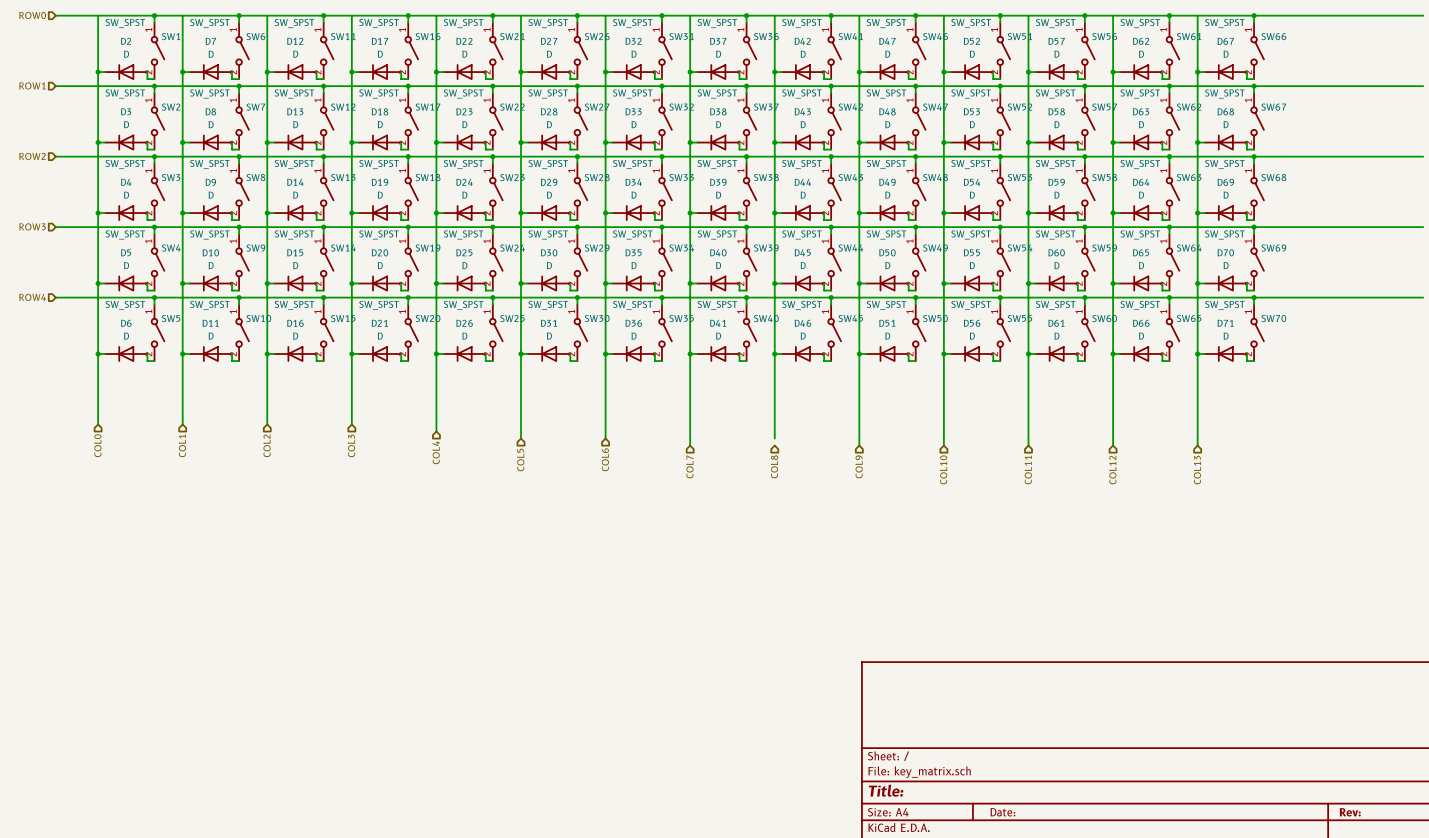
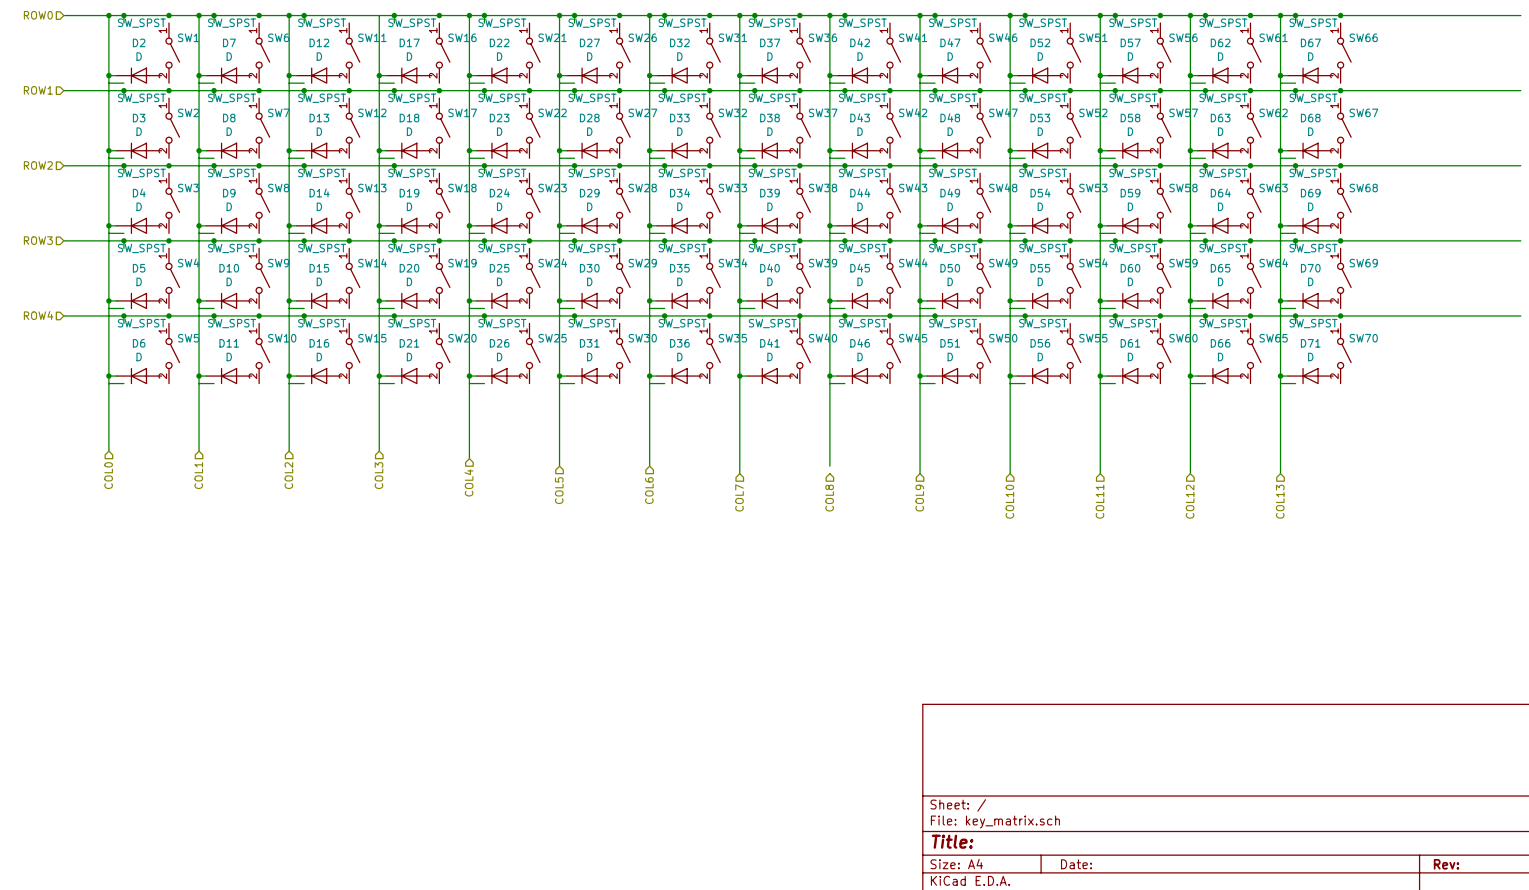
junction: none -> (108, 15)
junction: none -> (123, 15)
wire: (154, 15) (154, 22) -> (123, 15) (123, 23)
junction: none -> (199, 15)
junction: none -> (214, 15)
wire: (239, 15) (239, 22) -> (214, 15) (214, 23)
junction: none -> (289, 15)
junction: none -> (304, 15)
wire: (323, 15) (323, 22) -> (304, 15) (304, 23)
junction: (323, 15) -> none
junction: none -> (394, 15)
wire: (408, 15) (408, 22) -> (394, 15) (394, 23)
junction: none -> (469, 15)
junction: none -> (484, 15)
wire: (492, 15) (492, 22) -> (484, 15) (484, 23)
junction: (492, 15) -> none
junction: none -> (559, 15)
junction: none -> (574, 15)
wire: (577, 15) (577, 22) -> (574, 15) (574, 23)
junction: none -> (649, 15)
junction: none -> (664, 15)
wire: (661, 15) (661, 22) -> (664, 15) (664, 23)
junction: none -> (739, 15)
junction: none -> (754, 15)
wire: (746, 15) (746, 22) -> (754, 15) (754, 23)
junction: none -> (829, 15)
junction: none -> (844, 15)
wire: (831, 15) (831, 22) -> (844, 15) (844, 23)
junction: (831, 15) -> none
junction: none -> (920, 15)
junction: none -> (935, 15)
wire: (915, 15) (915, 22) -> (935, 15) (935, 23)
junction: (915, 15) -> none
junction: none -> (1010, 15)
junction: none -> (1025, 15)
wire: (1000, 15) (1000, 22) -> (1025, 15) (1025, 23)
junction: (1000, 15) -> none
junction: none -> (1100, 15)
junction: none -> (1115, 15)
wire: (1084, 15) (1084, 22) -> (1115, 15) (1115, 23)
junction: none -> (1190, 15)
junction: none -> (1205, 15)
wire: (1169, 15) (1169, 22) -> (1205, 15) (1205, 23)
junction: none -> (1280, 15)
junction: none -> (1295, 15)
wire: (1254, 15) (1254, 22) -> (1295, 15) (1295, 23)
wire: (147, 72) (147, 79) (154, 79) -> none
wire: (232, 72) (232, 79) (239, 79) -> none
wire: (316, 72) (316, 79) (323, 79) -> none
wire: (401, 72) (401, 79) (408, 79) -> none
wire: (485, 72) (485, 79) (492, 79) -> none
wire: (570, 72) (570, 79) (577, 79) -> none
wire: (654, 72) (654, 79) (661, 79) -> none
wire: (739, 72) (739, 79) (746, 79) -> none
wire: (824, 72) (824, 79) (831, 79) -> none
wire: (908, 72) (908, 79) (915, 79) -> none
wire: (993, 72) (993, 79) (1000, 79) -> none
wire: (1077, 72) (1077, 79) (1084, 79) -> none
wire: (1162, 72) (1162, 79) (1169, 79) -> none
wire: (1246, 72) (1246, 79) (1254, 79) -> none
wire: none -> (108, 83) (123, 83)
wire: none -> (199, 83) (214, 83)
wire: none -> (289, 83) (304, 83)
wire: none -> (379, 83) (394, 83)
wire: none -> (469, 83) (484, 83)
wire: none -> (559, 83) (574, 83)
wire: none -> (649, 83) (664, 83)
wire: none -> (739, 83) (754, 83)
wire: none -> (829, 83) (844, 83)
wire: none -> (920, 83) (935, 83)
wire: none -> (1010, 83) (1025, 83)
wire: none -> (1100, 83) (1115, 83)
wire: none -> (1190, 83) (1205, 83)
wire: none -> (1280, 83) (1295, 83)
junction: none -> (123, 90)
wire: (154, 86) (154, 93) -> (123, 90) (123, 98)
junction: none -> (214, 90)
wire: (239, 86) (239, 93) -> (214, 90) (214, 98)
junction: none -> (304, 90)
wire: (323, 86) (323, 93) -> (304, 90) (304, 98)
junction: none -> (394, 90)
wire: (408, 86) (408, 93) -> (394, 90) (394, 98)
junction: none -> (484, 90)
wire: (492, 86) (492, 93) -> (484, 90) (484, 98)
junction: none -> (574, 90)
wire: (577, 86) (577, 93) -> (574, 90) (574, 98)
junction: none -> (664, 90)
wire: (661, 86) (661, 93) -> (664, 90) (664, 98)
junction: none -> (754, 90)
wire: (746, 86) (746, 93) -> (754, 90) (754, 98)
junction: none -> (844, 90)
wire: (831, 86) (831, 93) -> (844, 90) (844, 98)
junction: none -> (935, 90)
wire: (915, 86) (915, 93) -> (935, 90) (935, 98)
junction: none -> (1025, 90)
wire: (1000, 86) (1000, 93) -> (1025, 90) (1025, 98)
junction: none -> (1115, 90)
wire: (1084, 86) (1084, 93) -> (1115, 90) (1115, 98)
junction: none -> (1205, 90)
wire: (1169, 86) (1169, 93) -> (1205, 90) (1205, 98)
junction: none -> (1295, 90)
wire: (1254, 86) (1254, 93) -> (1295, 90) (1295, 98)
wire: (147, 142) (147, 149) (154, 149) -> none
wire: (232, 142) (232, 149) (239, 149) -> none
wire: (316, 142) (316, 149) (323, 149) -> none
wire: (401, 142) (401, 149) (408, 149) -> none
wire: (485, 142) (485, 149) (492, 149) -> none
wire: (570, 142) (570, 149) (577, 149) -> none
wire: (654, 142) (654, 149) (661, 149) -> none
wire: (739, 142) (739, 149) (746, 149) -> none
wire: (824, 142) (824, 149) (831, 149) -> none
wire: (908, 142) (908, 149) (915, 149) -> none
wire: (993, 142) (993, 149) (1000, 149) -> none
wire: (1077, 142) (1077, 149) (1084, 149) -> none
wire: (1162, 142) (1162, 149) (1169, 149) -> none
wire: (1246, 142) (1246, 149) (1254, 149) -> none
wire: none -> (108, 158) (123, 158)
wire: none -> (199, 158) (214, 158)
wire: none -> (289, 158) (304, 158)
wire: none -> (379, 158) (394, 158)
wire: none -> (469, 158) (484, 158)
wire: none -> (559, 158) (574, 158)
wire: none -> (649, 158) (664, 158)
wire: none -> (739, 158) (754, 158)
wire: none -> (829, 158) (844, 158)
wire: none -> (920, 158) (935, 158)
wire: none -> (1010, 158) (1025, 158)
wire: none -> (1100, 158) (1115, 158)
wire: none -> (1190, 158) (1205, 158)
wire: none -> (1280, 158) (1295, 158)
junction: none -> (123, 165)
wire: (154, 156) (154, 163) -> (123, 165) (123, 173)
junction: none -> (214, 165)
wire: (239, 156) (239, 163) -> (214, 165) (214, 173)
junction: none -> (304, 165)
wire: (323, 156) (323, 163) -> (304, 165) (304, 173)
junction: (323, 156) -> none
junction: none -> (394, 165)
wire: (408, 156) (408, 163) -> (394, 165) (394, 173)
junction: (408, 156) -> none
junction: none -> (484, 165)
wire: (492, 156) (492, 163) -> (484, 165) (484, 173)
junction: (492, 156) -> none
junction: none -> (574, 165)
wire: (577, 156) (577, 163) -> (574, 165) (574, 173)
junction: none -> (664, 165)
wire: (661, 156) (661, 163) -> (664, 165) (664, 173)
junction: none -> (754, 165)
wire: (746, 156) (746, 163) -> (754, 165) (754, 173)
junction: none -> (844, 165)
wire: (831, 156) (831, 163) -> (844, 165) (844, 173)
junction: none -> (935, 165)
wire: (915, 156) (915, 163) -> (935, 165) (935, 173)
junction: (915, 156) -> none
junction: none -> (1025, 165)
wire: (1000, 156) (1000, 163) -> (1025, 165) (1025, 173)
junction: (1000, 156) -> none
junction: none -> (1115, 165)
wire: (1084, 156) (1084, 163) -> (1115, 165) (1115, 173)
junction: none -> (1205, 165)
wire: (1169, 156) (1169, 163) -> (1205, 165) (1205, 173)
junction: none -> (1295, 165)
wire: (1254, 156) (1254, 163) -> (1295, 165) (1295, 173)
wire: (147, 213) (147, 220) (154, 220) -> none
wire: (232, 213) (232, 220) (239, 220) -> none
wire: (316, 213) (316, 220) (323, 220) -> none
wire: (401, 213) (401, 220) (408, 220) -> none
wire: (485, 213) (485, 220) (492, 220) -> none
wire: (570, 213) (570, 220) (577, 220) -> none
wire: (654, 213) (654, 220) (661, 220) -> none
wire: (739, 213) (739, 220) (746, 220) -> none
wire: (824, 213) (824, 220) (831, 220) -> none
wire: (908, 213) (908, 220) (915, 220) -> none
wire: (993, 213) (993, 220) (1000, 220) -> none
wire: (1077, 213) (1077, 220) (1084, 220) -> none
wire: (1162, 213) (1162, 220) (1169, 220) -> none
wire: (1246, 213) (1246, 220) (1254, 220) -> none
wire: none -> (108, 233) (123, 233)
wire: none -> (199, 233) (214, 233)
wire: none -> (289, 233) (304, 233)
wire: none -> (379, 233) (394, 233)
wire: none -> (469, 233) (484, 233)
wire: none -> (559, 233) (574, 233)
wire: none -> (649, 233) (664, 233)
wire: none -> (739, 233) (754, 233)
wire: none -> (829, 233) (844, 233)
wire: none -> (920, 233) (935, 233)
wire: none -> (1010, 233) (1025, 233)
wire: none -> (1100, 233) (1115, 233)
wire: none -> (1190, 233) (1205, 233)
wire: none -> (1280, 233) (1295, 233)
junction: none -> (123, 240)
wire: (154, 227) (154, 234) -> (123, 240) (123, 248)
junction: none -> (214, 240)
wire: (239, 227) (239, 234) -> (214, 240) (214, 248)
junction: none -> (304, 240)
wire: (323, 227) (323, 234) -> (304, 240) (304, 248)
junction: none -> (394, 240)
wire: (408, 227) (408, 234) -> (394, 240) (394, 248)
junction: none -> (484, 240)
wire: (492, 227) (492, 234) -> (484, 240) (484, 248)
junction: none -> (574, 240)
wire: (577, 227) (577, 234) -> (574, 240) (574, 248)
junction: none -> (664, 240)
wire: (661, 227) (661, 234) -> (664, 240) (664, 248)
junction: none -> (754, 240)
wire: (746, 227) (746, 234) -> (754, 240) (754, 248)
junction: none -> (844, 240)
wire: (831, 227) (831, 234) -> (844, 240) (844, 248)
junction: none -> (935, 240)
wire: (915, 227) (915, 234) -> (935, 240) (935, 248)
junction: none -> (1025, 240)
wire: (1000, 227) (1000, 234) -> (1025, 240) (1025, 248)
junction: none -> (1115, 240)
wire: (1084, 227) (1084, 234) -> (1115, 240) (1115, 248)
junction: none -> (1205, 240)
wire: (1169, 227) (1169, 234) -> (1205, 240) (1205, 248)
junction: none -> (1295, 240)
wire: (1254, 227) (1254, 234) -> (1295, 240) (1295, 248)
wire: (147, 283) (147, 290) (154, 290) -> none
wire: (232, 283) (232, 290) (239, 290) -> none
wire: (316, 283) (316, 290) (323, 290) -> none
wire: (401, 283) (401, 290) (408, 290) -> none
wire: (485, 283) (485, 290) (492, 290) -> none
wire: (570, 283) (570, 290) (577, 290) -> none
wire: (654, 283) (654, 290) (661, 290) -> none
wire: (739, 283) (739, 290) (746, 290) -> none
wire: (824, 283) (824, 290) (831, 290) -> none
wire: (908, 283) (908, 290) (915, 290) -> none
wire: (993, 283) (993, 290) (1000, 290) -> none
wire: (1077, 283) (1077, 290) (1084, 290) -> none
wire: (1162, 283) (1162, 290) (1169, 290) -> none
wire: (1246, 283) (1246, 290) (1254, 290) -> none
wire: none -> (108, 308) (123, 308)
wire: none -> (199, 308) (214, 308)
wire: none -> (289, 308) (304, 308)
wire: none -> (379, 308) (394, 308)
wire: none -> (469, 308) (484, 308)
wire: none -> (559, 308) (574, 308)
wire: none -> (649, 308) (664, 308)
wire: none -> (739, 308) (754, 308)
wire: none -> (829, 308) (844, 308)
wire: none -> (920, 308) (935, 308)
wire: none -> (1010, 308) (1025, 308)
wire: none -> (1100, 308) (1115, 308)
wire: none -> (1190, 308) (1205, 308)
wire: none -> (1280, 308) (1295, 308)
junction: none -> (123, 315)
wire: (154, 297) (154, 304) -> (123, 315) (123, 323)
junction: none -> (214, 315)
wire: (239, 297) (239, 304) -> (214, 315) (214, 323)
junction: none -> (304, 315)
wire: (323, 297) (323, 304) -> (304, 315) (304, 323)
junction: (323, 297) -> none
junction: none -> (394, 315)
wire: (408, 297) (408, 304) -> (394, 315) (394, 323)
junction: (408, 297) -> none
junction: none -> (484, 315)
wire: (492, 297) (492, 304) -> (484, 315) (484, 323)
junction: (492, 297) -> none
junction: none -> (574, 315)
wire: (577, 297) (577, 304) -> (574, 315) (574, 323)
junction: (577, 297) -> none
junction: none -> (664, 315)
wire: (661, 297) (661, 304) -> (664, 315) (664, 323)
junction: none -> (844, 315)
wire: (831, 297) (831, 304) -> (844, 315) (844, 323)
junction: none -> (935, 315)
wire: (915, 297) (915, 304) -> (935, 315) (935, 323)
junction: (915, 297) -> none
junction: none -> (1025, 315)
wire: (1000, 297) (1000, 304) -> (1025, 315) (1025, 323)
junction: (1000, 297) -> none
junction: none -> (1115, 315)
wire: (1084, 297) (1084, 304) -> (1115, 315) (1115, 323)
junction: none -> (1205, 315)
wire: (1169, 297) (1169, 304) -> (1205, 315) (1205, 323)
junction: none -> (1295, 315)
wire: (1254, 297) (1254, 304) -> (1295, 315) (1295, 323)
wire: (147, 353) (147, 361) (154, 361) -> none
wire: (232, 353) (232, 361) (239, 361) -> none
wire: (316, 353) (316, 361) (323, 361) -> none
wire: (401, 353) (401, 361) (408, 361) -> none
wire: (485, 353) (485, 361) (492, 361) -> none
wire: (570, 353) (570, 361) (577, 361) -> none
wire: (654, 353) (654, 361) (661, 361) -> none
wire: (739, 353) (739, 361) (746, 361) -> none
wire: (824, 353) (824, 361) (831, 361) -> none
wire: (908, 353) (908, 361) (915, 361) -> none
wire: (993, 353) (993, 361) (1000, 361) -> none
wire: (1077, 353) (1077, 361) (1084, 361) -> none
wire: (1162, 353) (1162, 361) (1169, 361) -> none
wire: (1246, 353) (1246, 361) (1254, 361) -> none
wire: none -> (108, 383) (123, 383)
wire: none -> (199, 383) (214, 383)
wire: none -> (289, 383) (304, 383)
wire: none -> (379, 383) (394, 383)
wire: none -> (469, 383) (484, 383)
wire: none -> (559, 383) (574, 383)
wire: none -> (649, 383) (664, 383)
wire: none -> (829, 383) (844, 383)
wire: none -> (920, 383) (935, 383)
wire: none -> (1010, 383) (1025, 383)
wire: none -> (1100, 383) (1115, 383)
wire: none -> (1190, 383) (1205, 383)
wire: none -> (1280, 383) (1295, 383)

